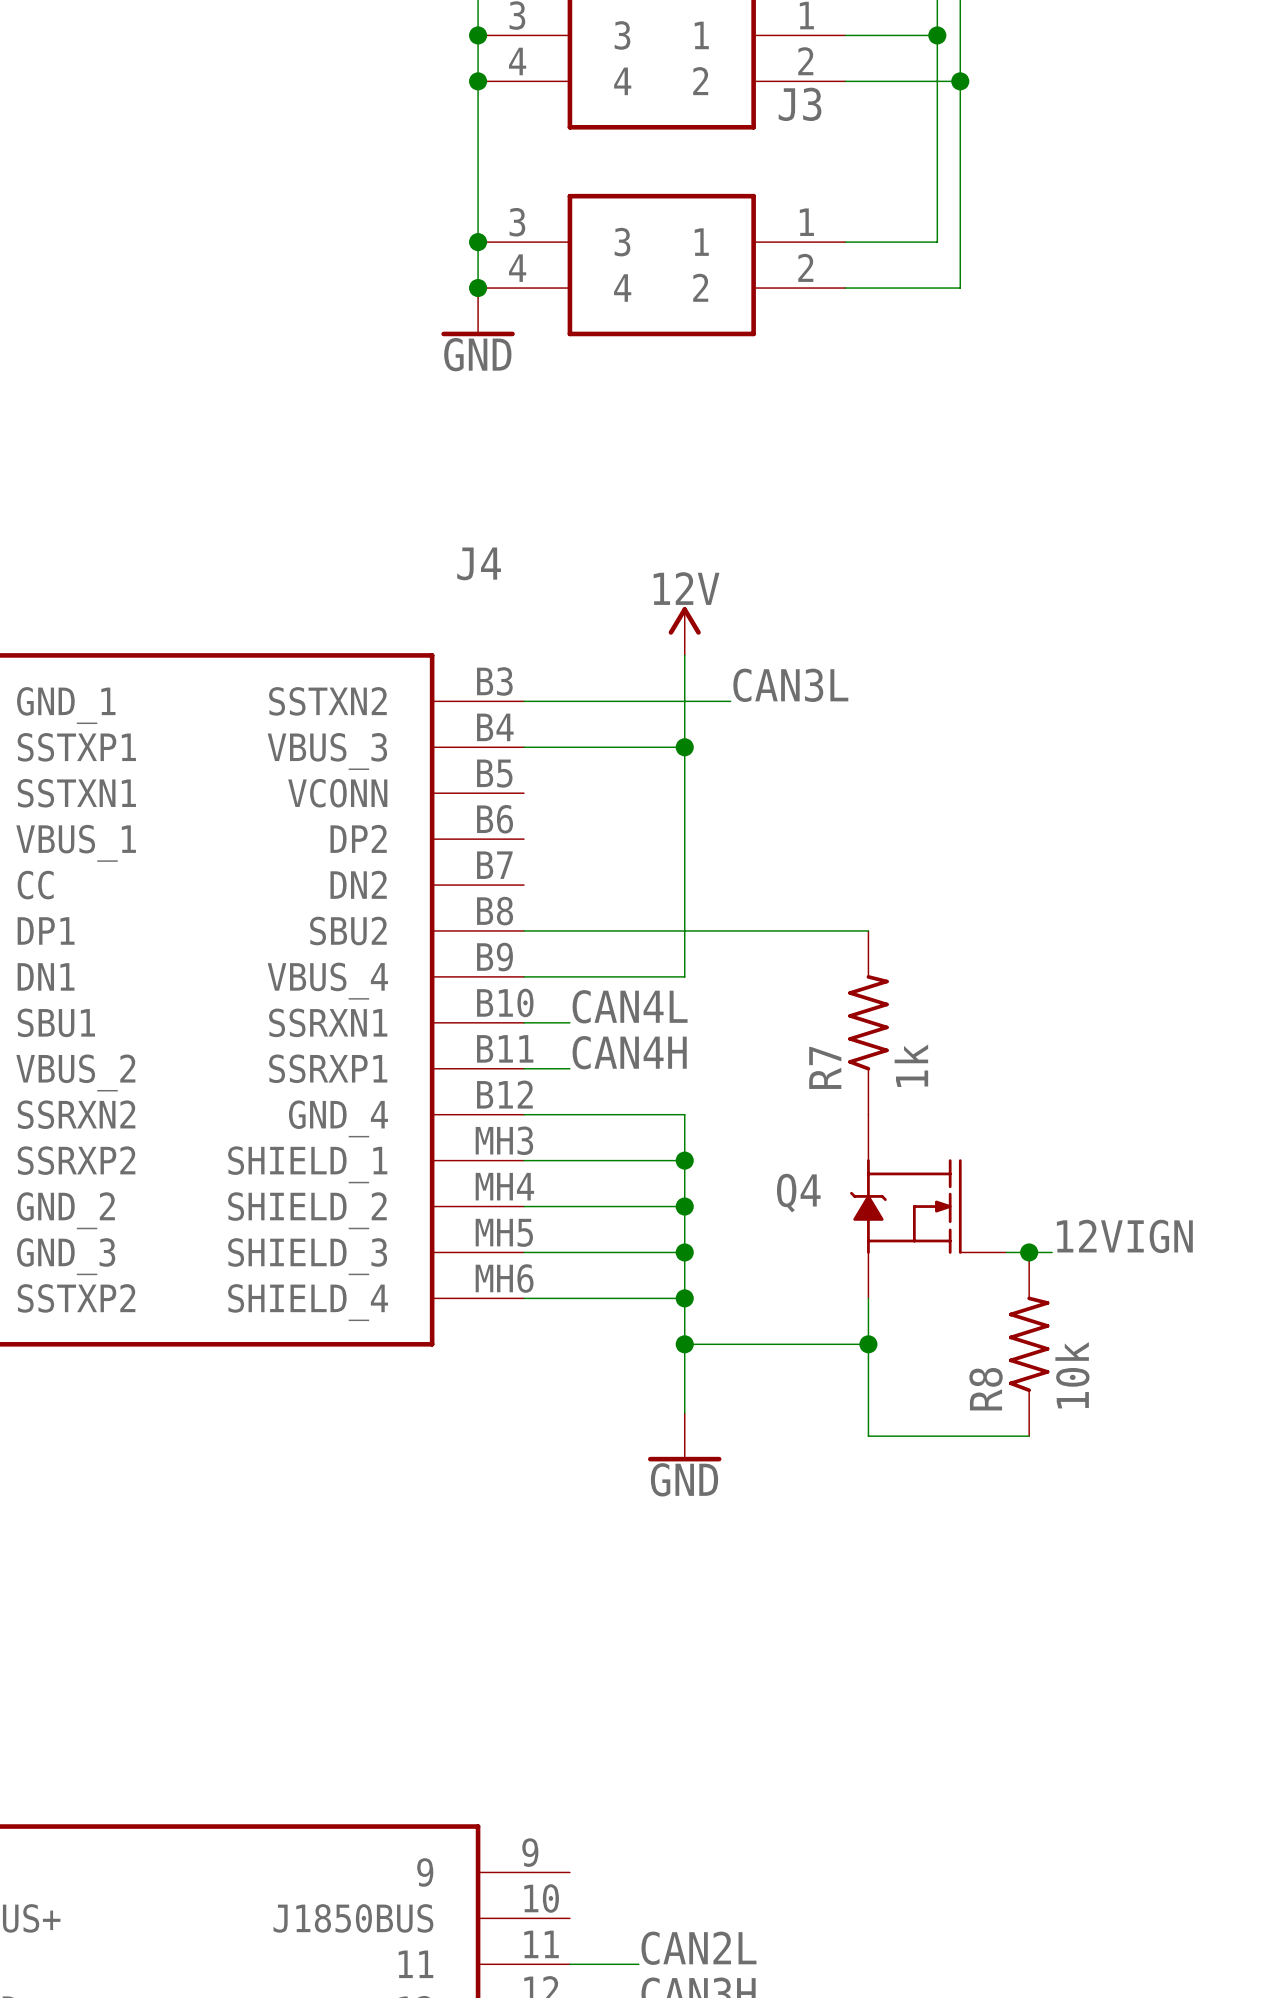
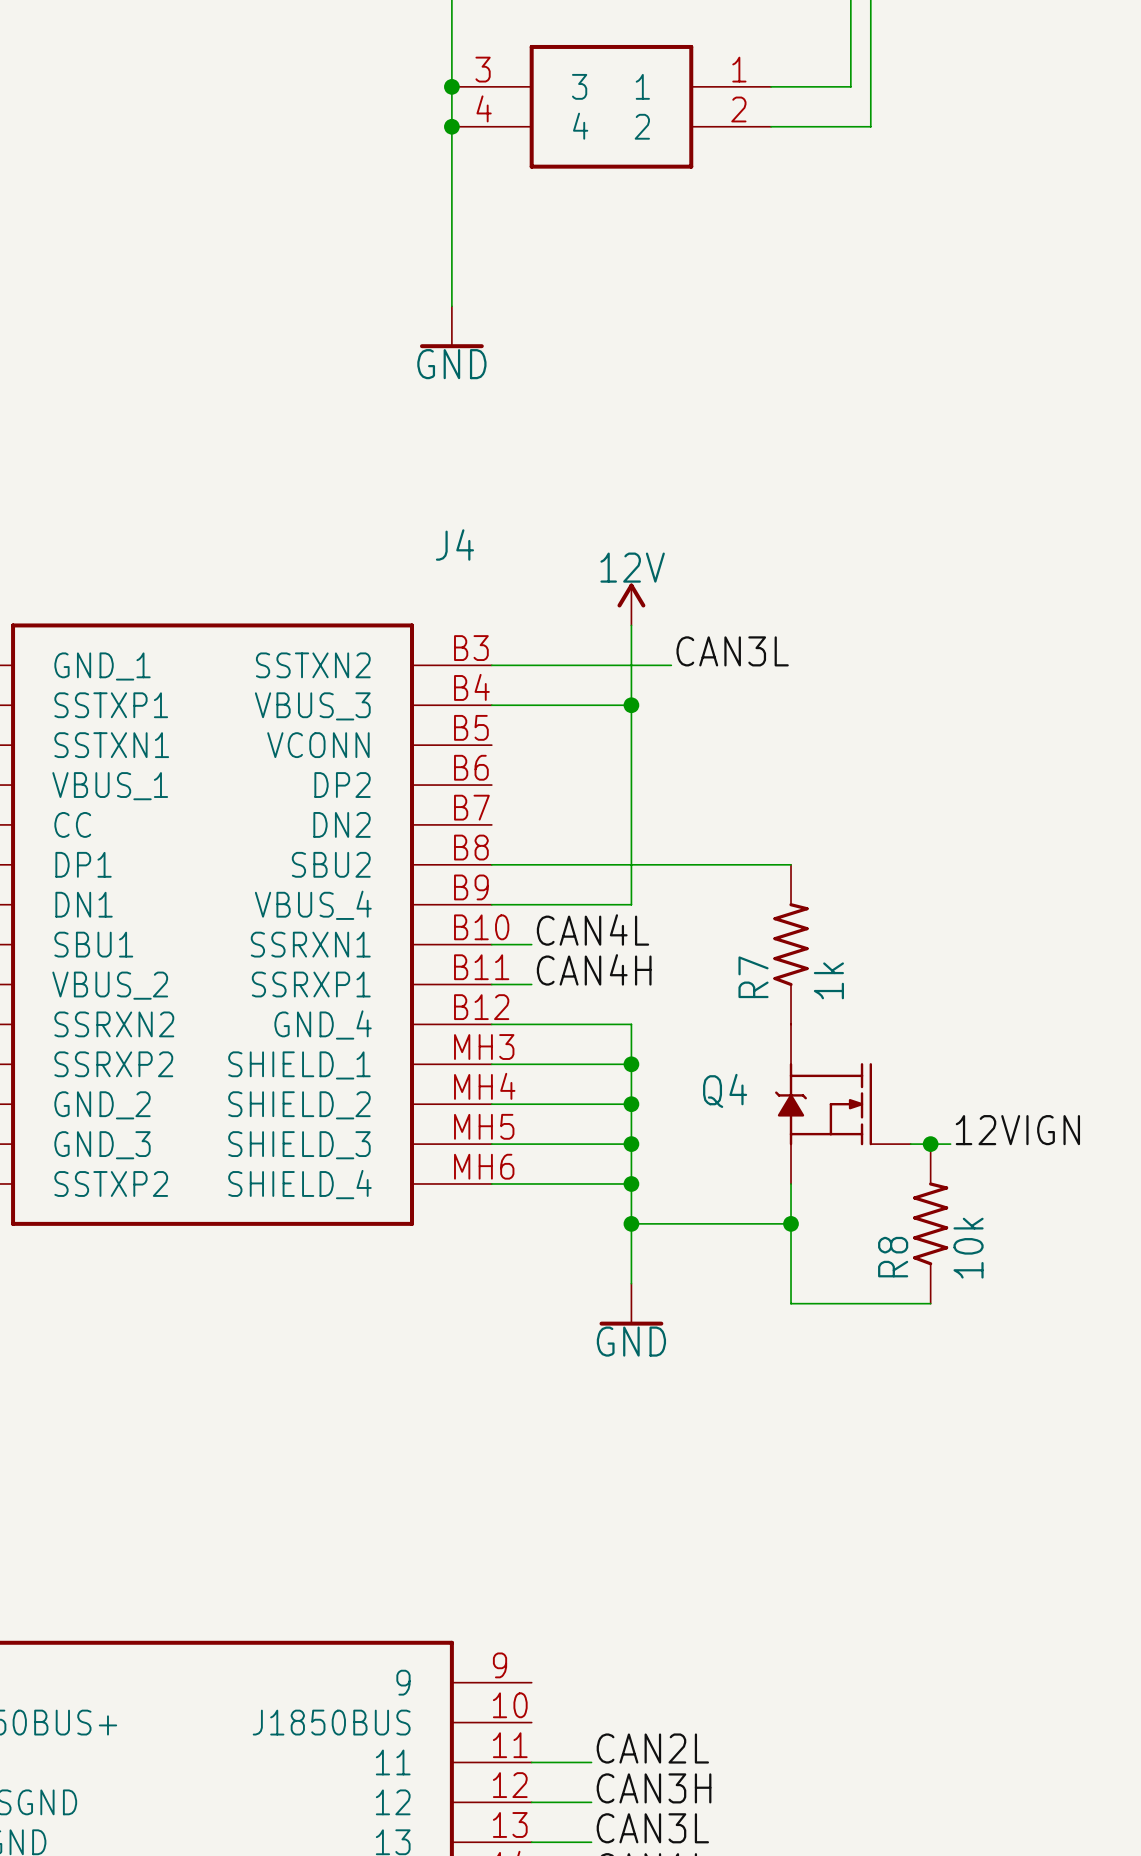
wire: (937, 35) (937, 242) (845, 242) -> none
junction: (937, 35) -> none
wire: (960, 81) (960, 288) (845, 288) -> none
junction: (960, 81) -> none
junction: (478, 242) -> none
J3: (661, 265) -> none
junction: (478, 288) -> none

